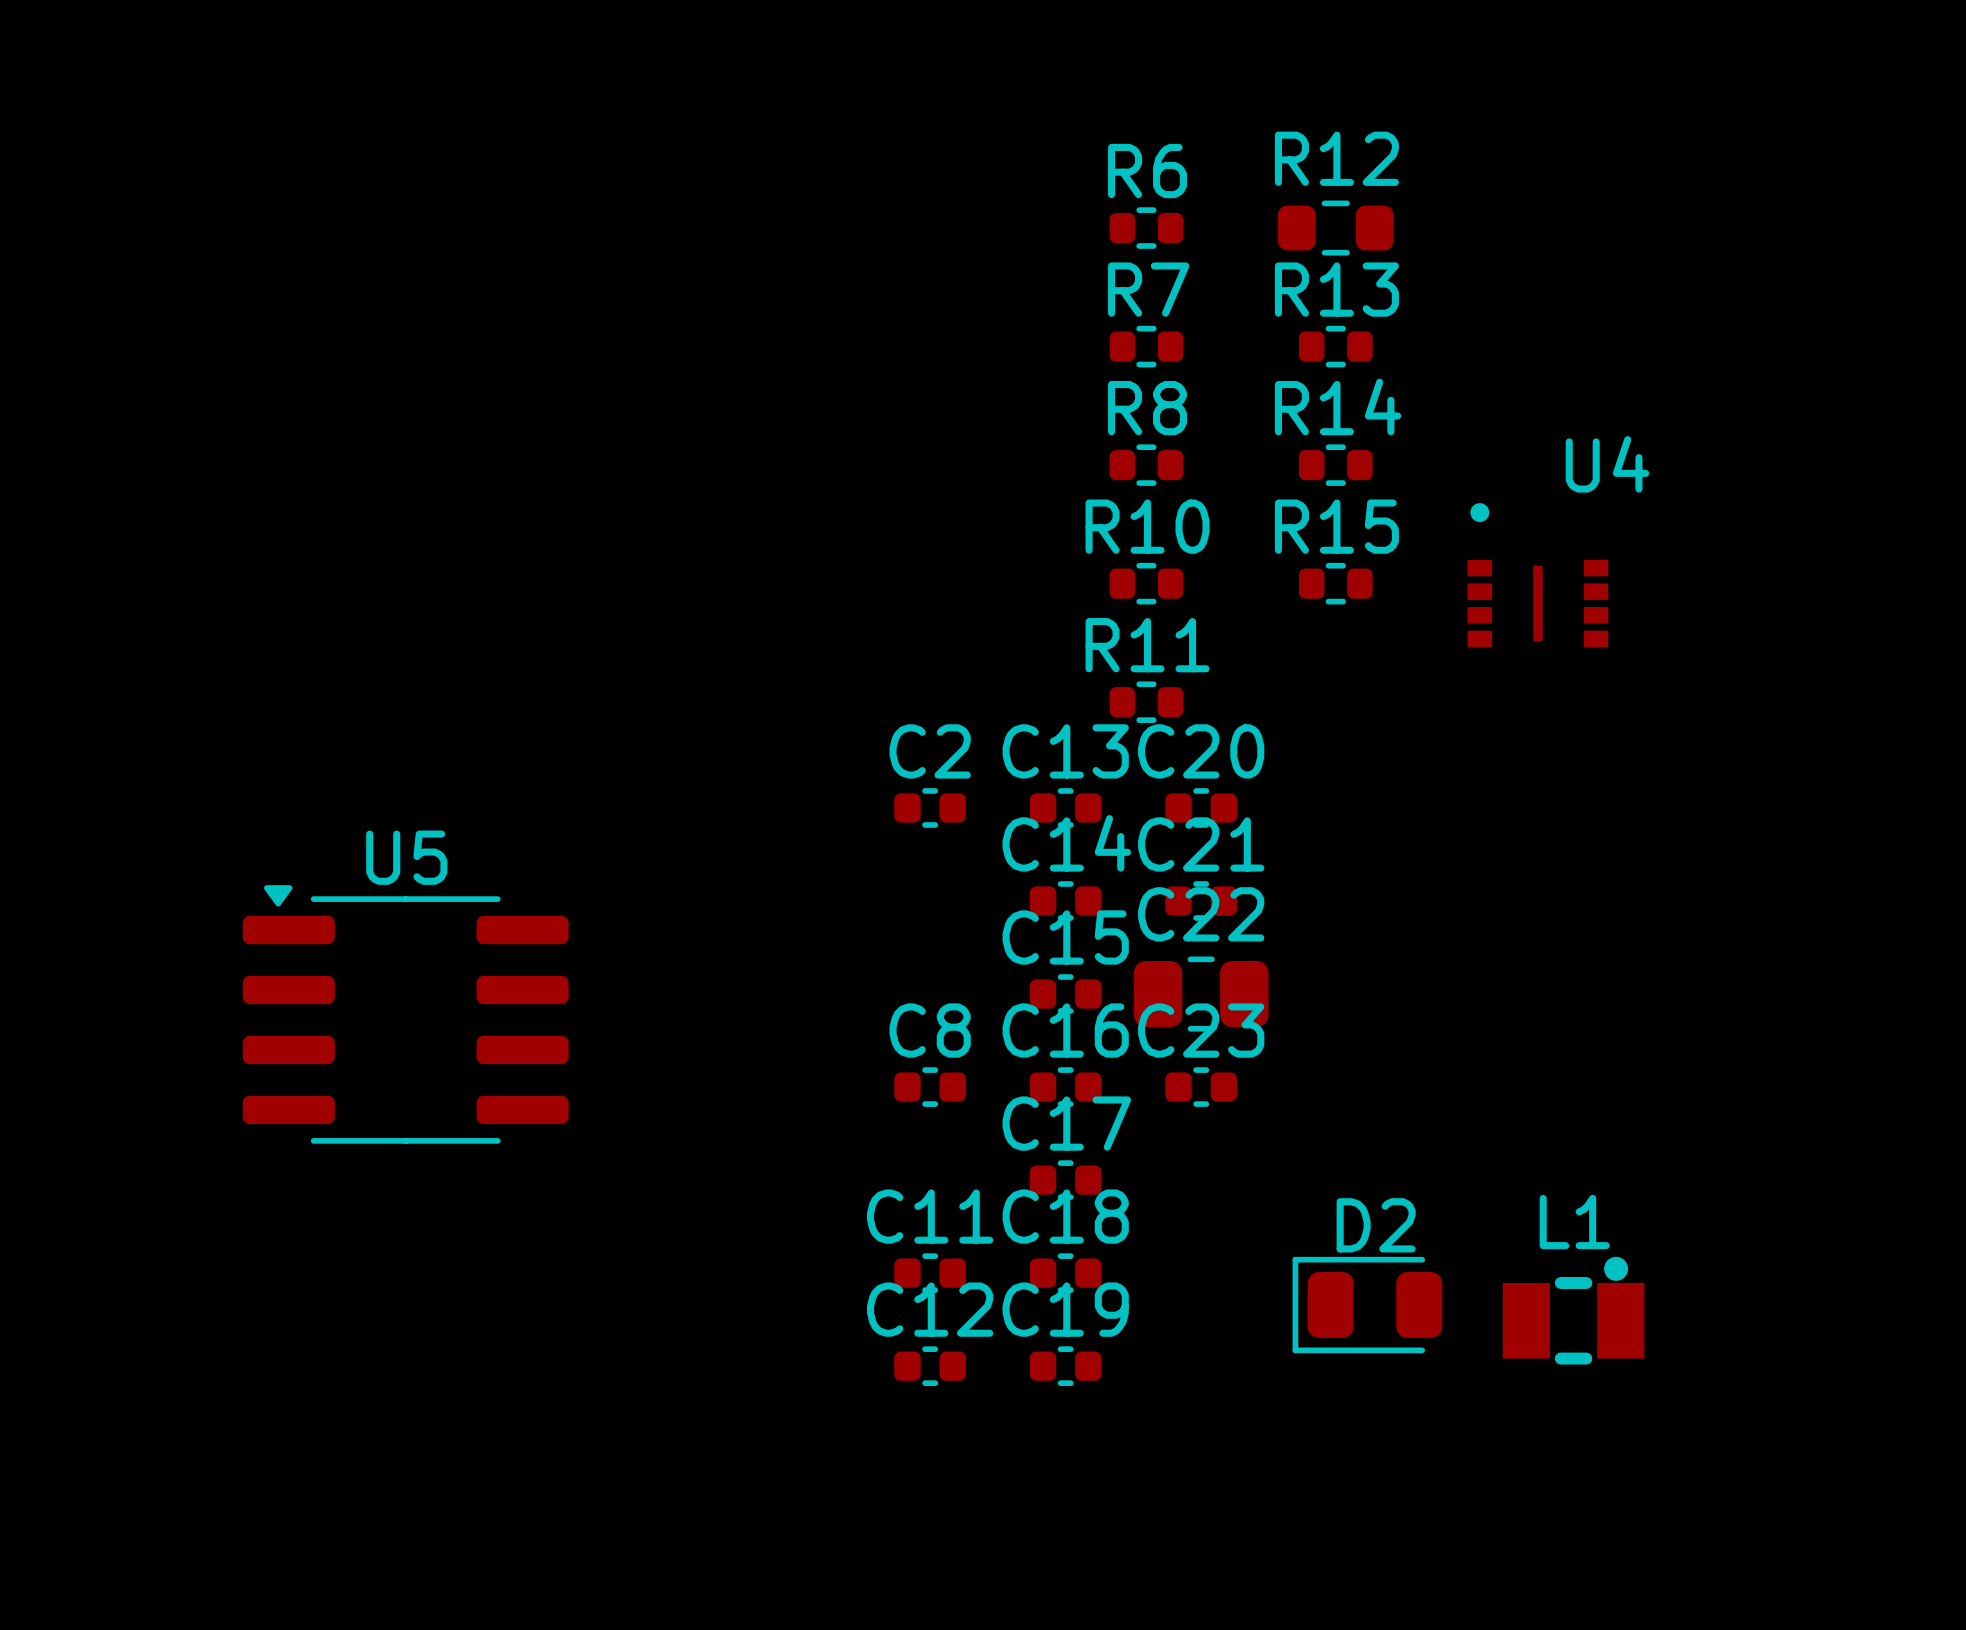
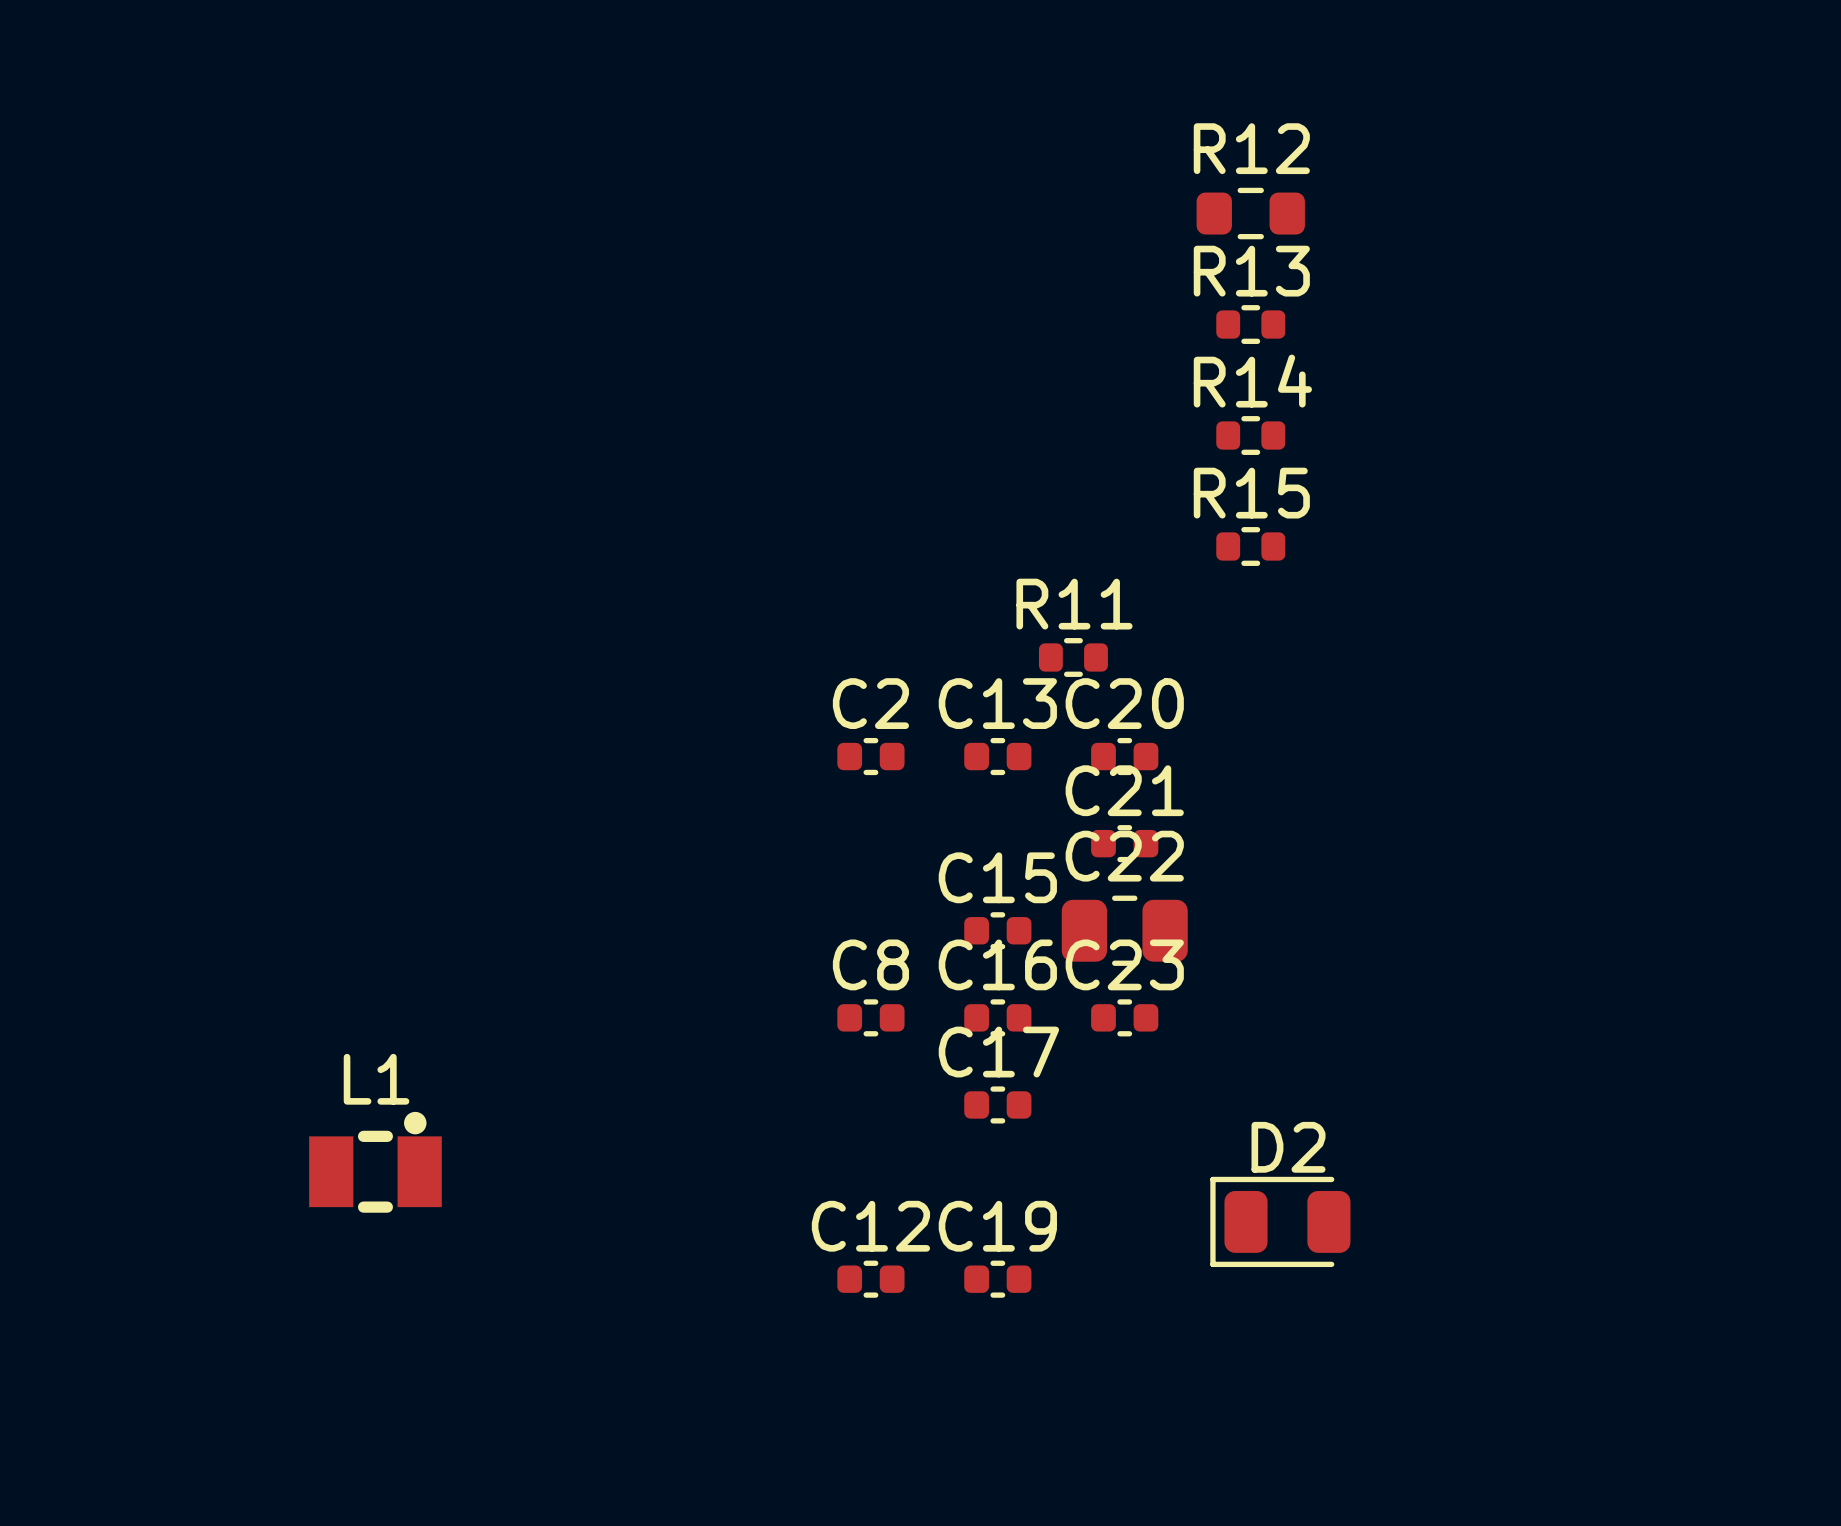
R6: (1146, 228) -> none
R7: (1146, 346) -> none
R8: (1146, 465) -> none
U4: (1537, 575) -> none
R10: (1146, 583) -> none
C14: (1065, 901) -> none
U5: (405, 1014) -> none
C11: (930, 1273) -> none
C18: (1065, 1273) -> none
L1 position: (1573, 1310) -> (375, 1162)

